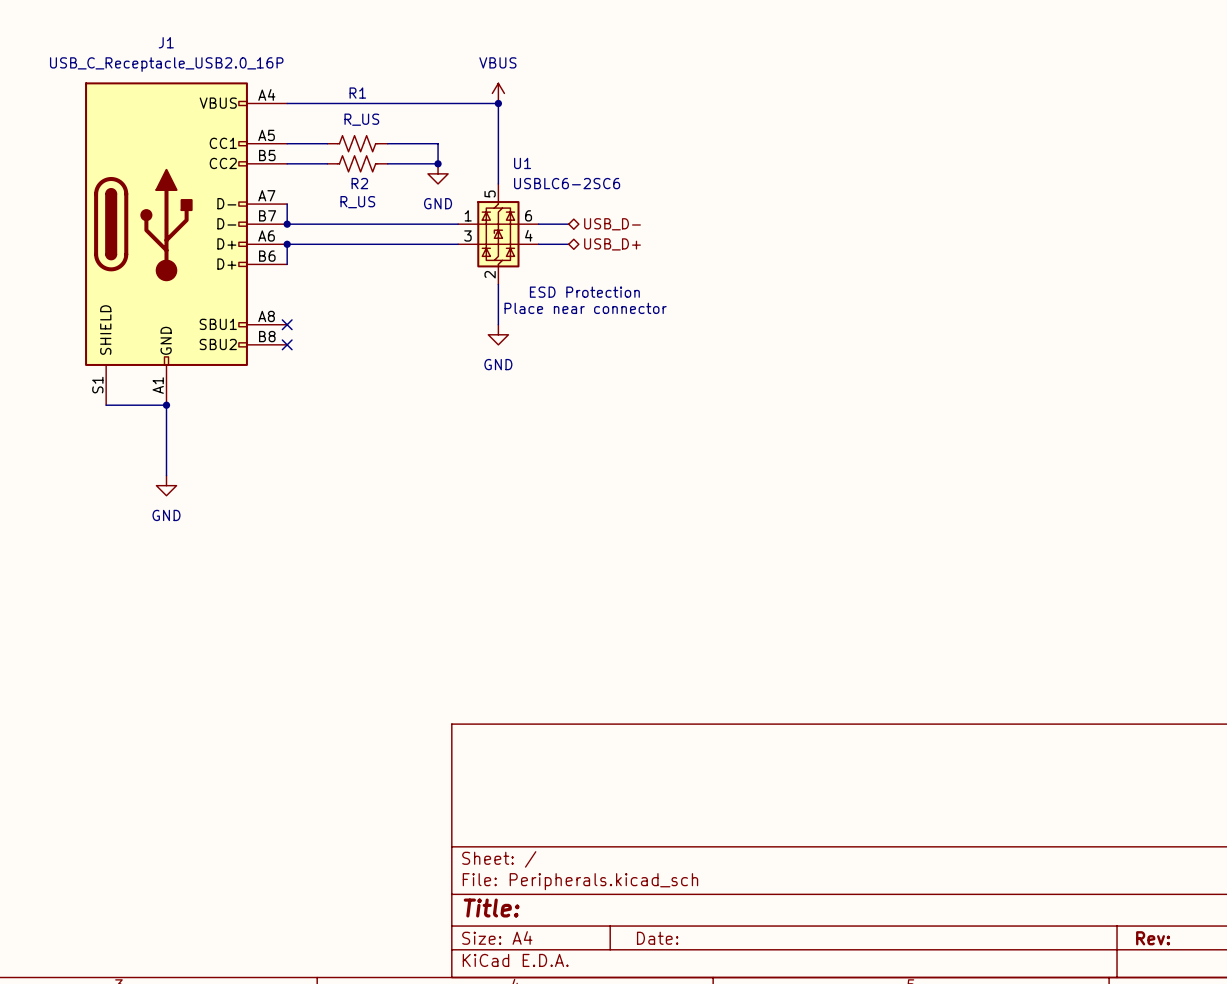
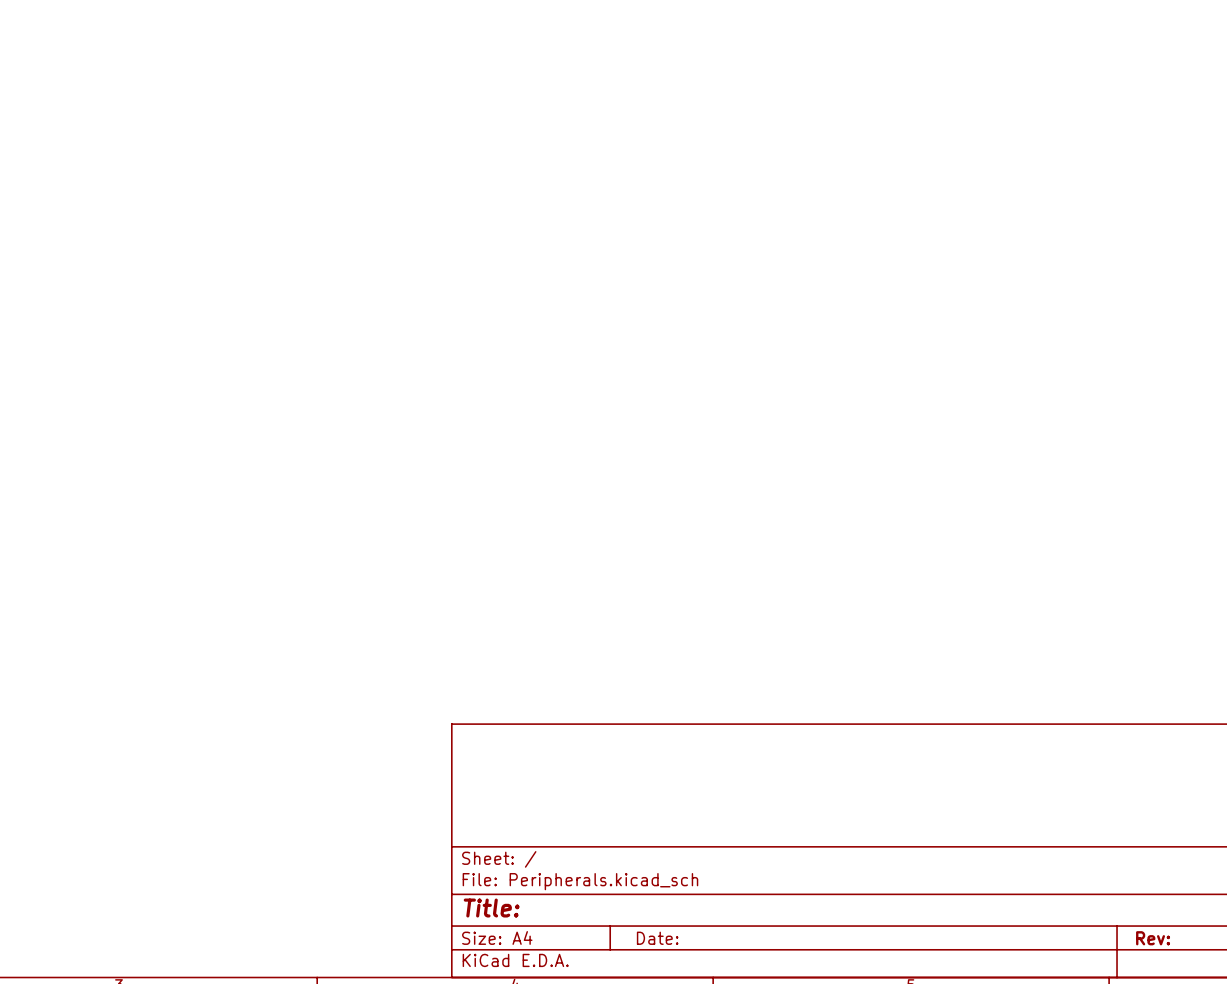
power symbol: VBUS (498, 93) -> none
wire: (287, 103) (498, 103) (498, 183) -> none
junction: (498, 103) -> none
wire: (287, 143) (327, 143) -> none
R1: R_US (357, 143) -> none
wire: (387, 143) (438, 143) (438, 163) (387, 163) -> none
wire: (287, 163) (327, 163) -> none
R2: R_US (357, 163) -> none
junction: (438, 163) -> none
power symbol: GND (438, 173) -> none
wire: (287, 204) (287, 224) (458, 224) -> none
junction: (287, 224) -> none
wire: (538, 224) (568, 224) -> none
hierarchical label: USB_D- (612, 224) -> none
U1: USBLC6-2SC6 (498, 234) -> none
J1: USB_C_Receptacle_USB2.0_16P (186, 243) -> none
junction: (287, 244) -> none
wire: (458, 244) (287, 244) (287, 264) -> none
wire: (538, 244) (568, 244) -> none
hierarchical label: USB_D+ (612, 244) -> none
wire: (498, 284) (498, 324) -> none
text: ESD Protection (584, 292) -> none
text: Place near connector (585, 308) -> none
no-connect mark: (287, 324) -> none
power symbol: GND (498, 334) -> none
no-connect mark: (287, 344) -> none
wire: (106, 405) (166, 405) (166, 475) -> none
junction: (166, 405) -> none
power symbol: GND (166, 485) -> none

